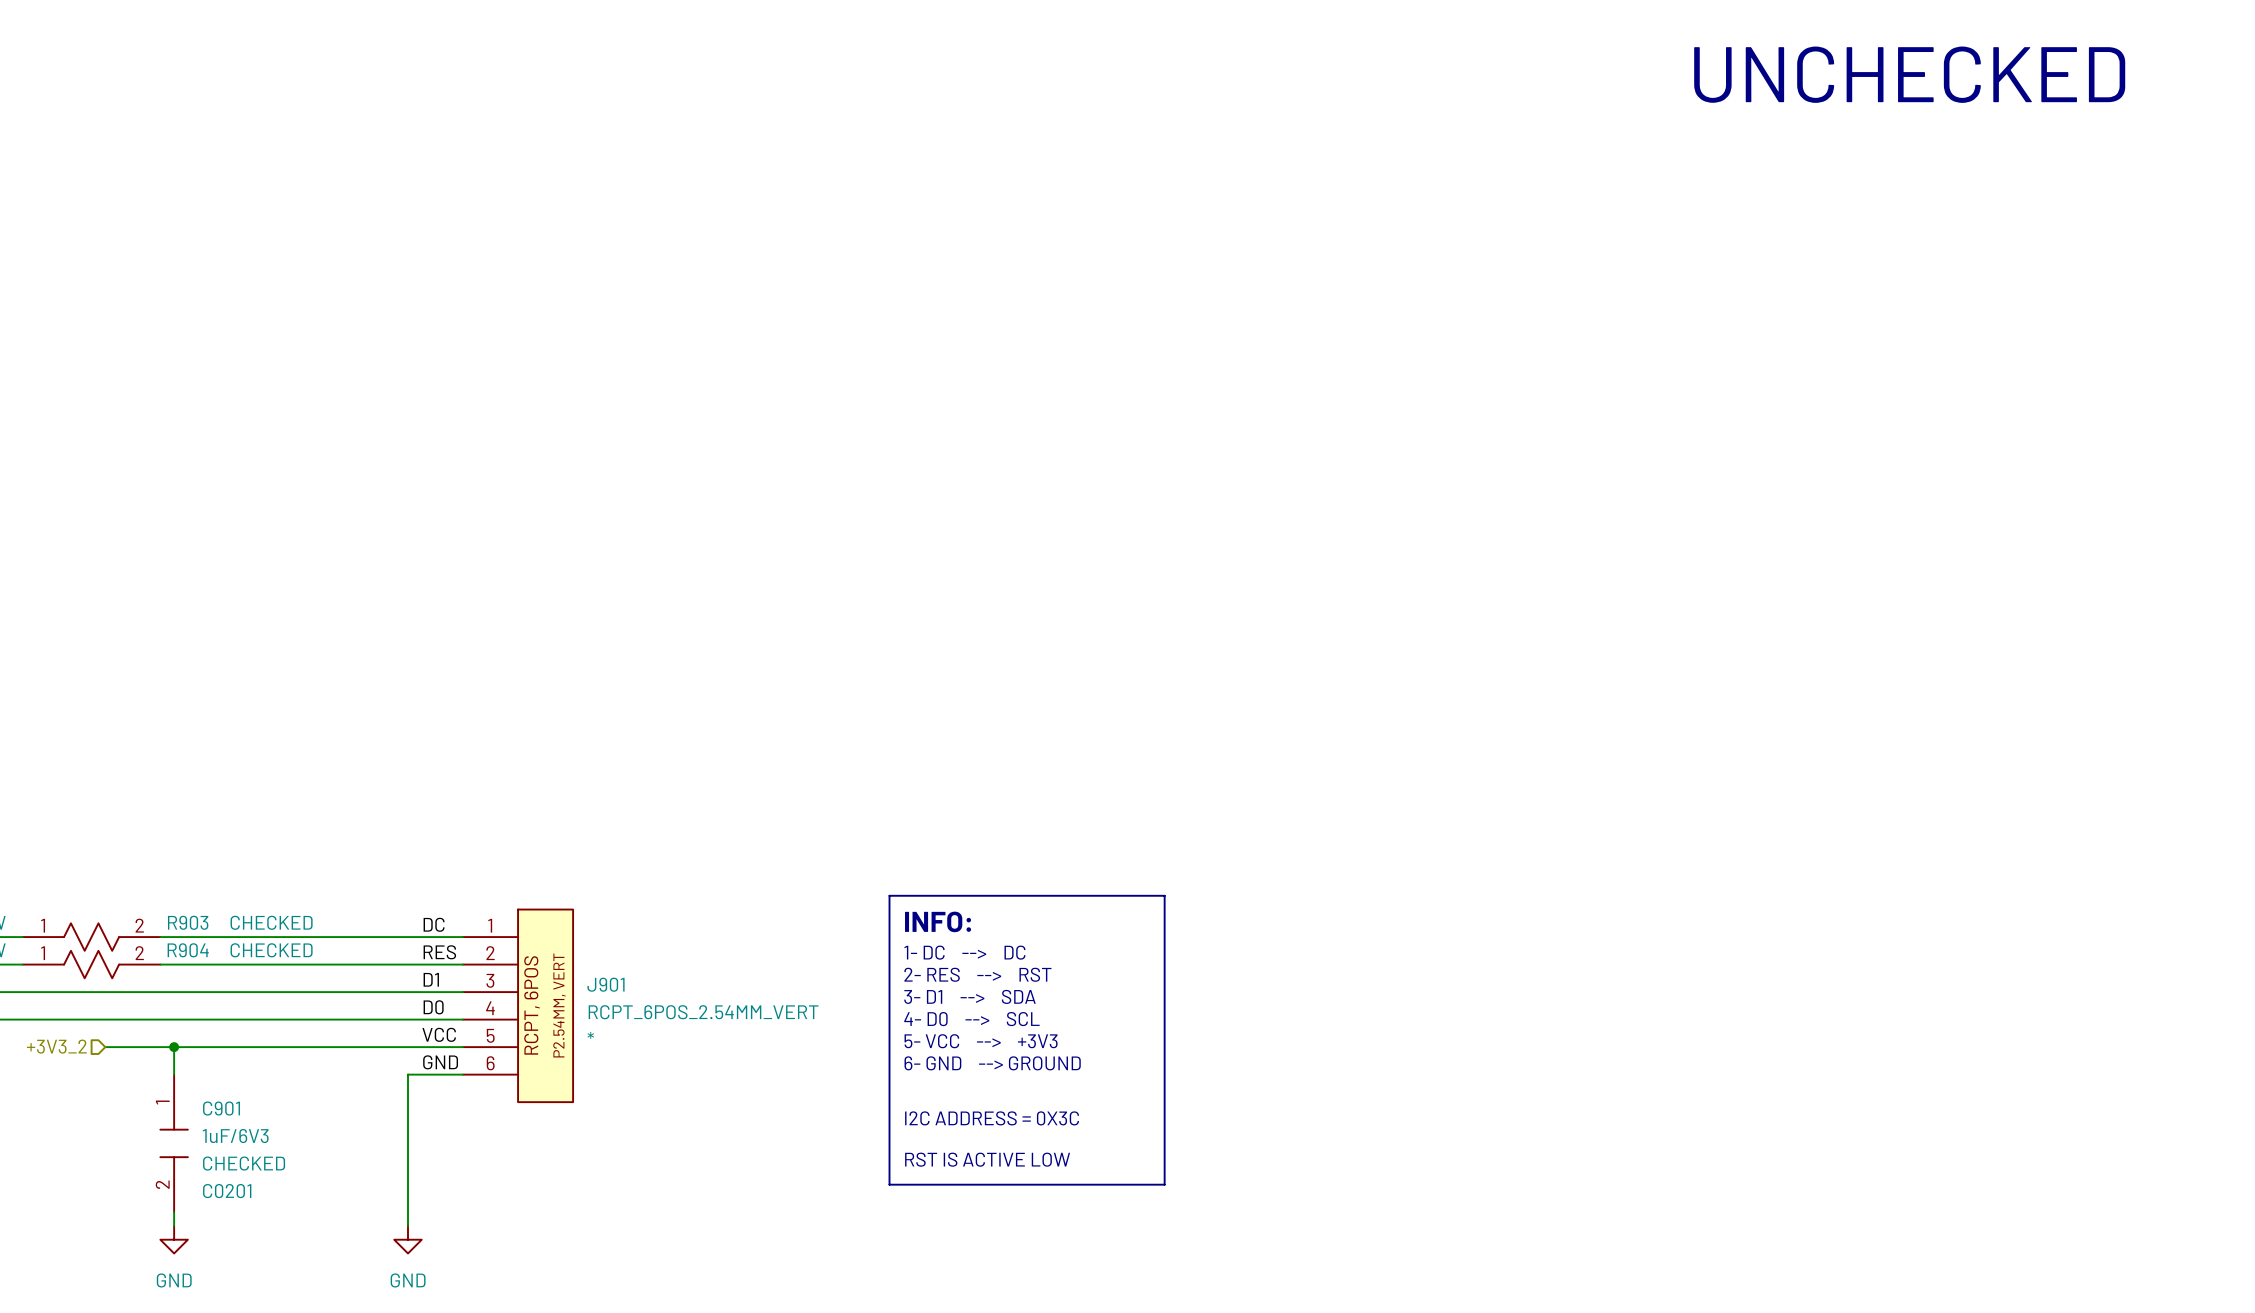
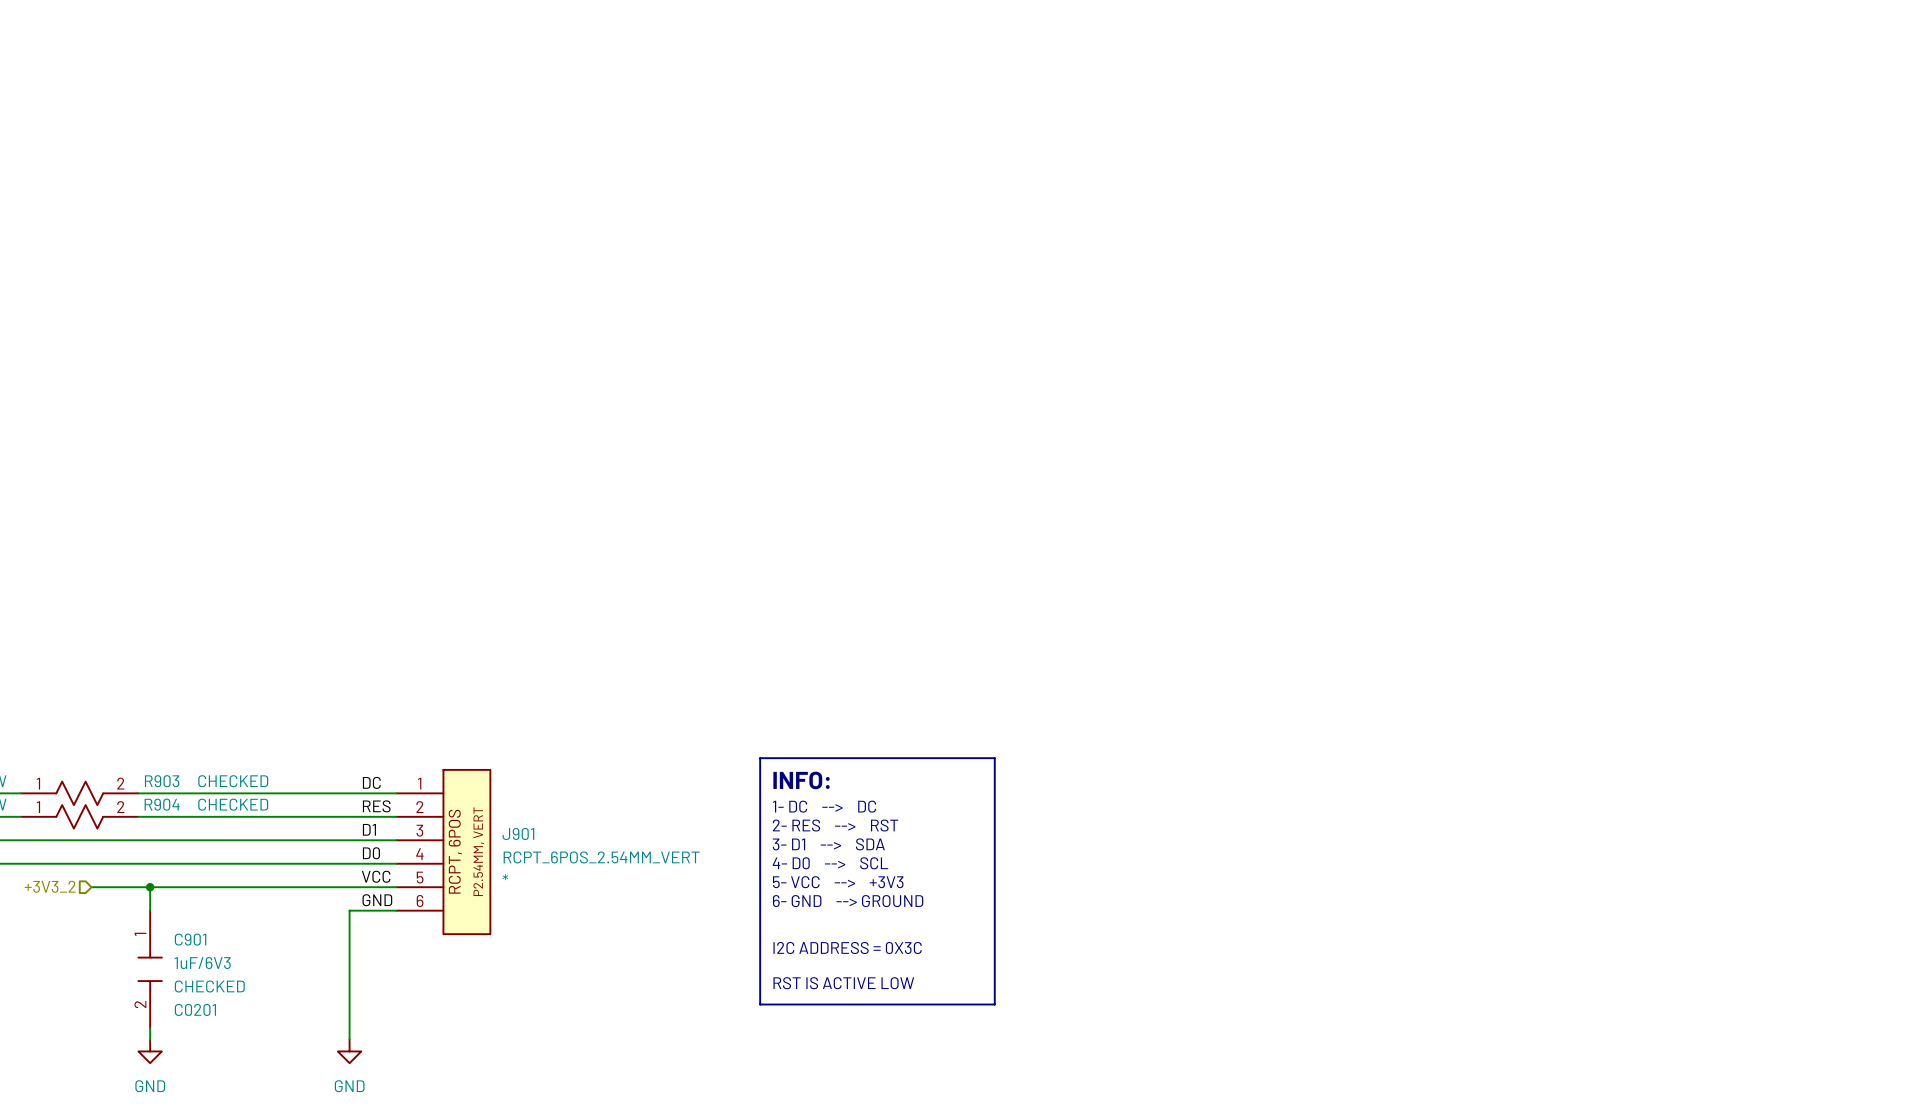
text: UNCHECKED (1909, 74) -> none

